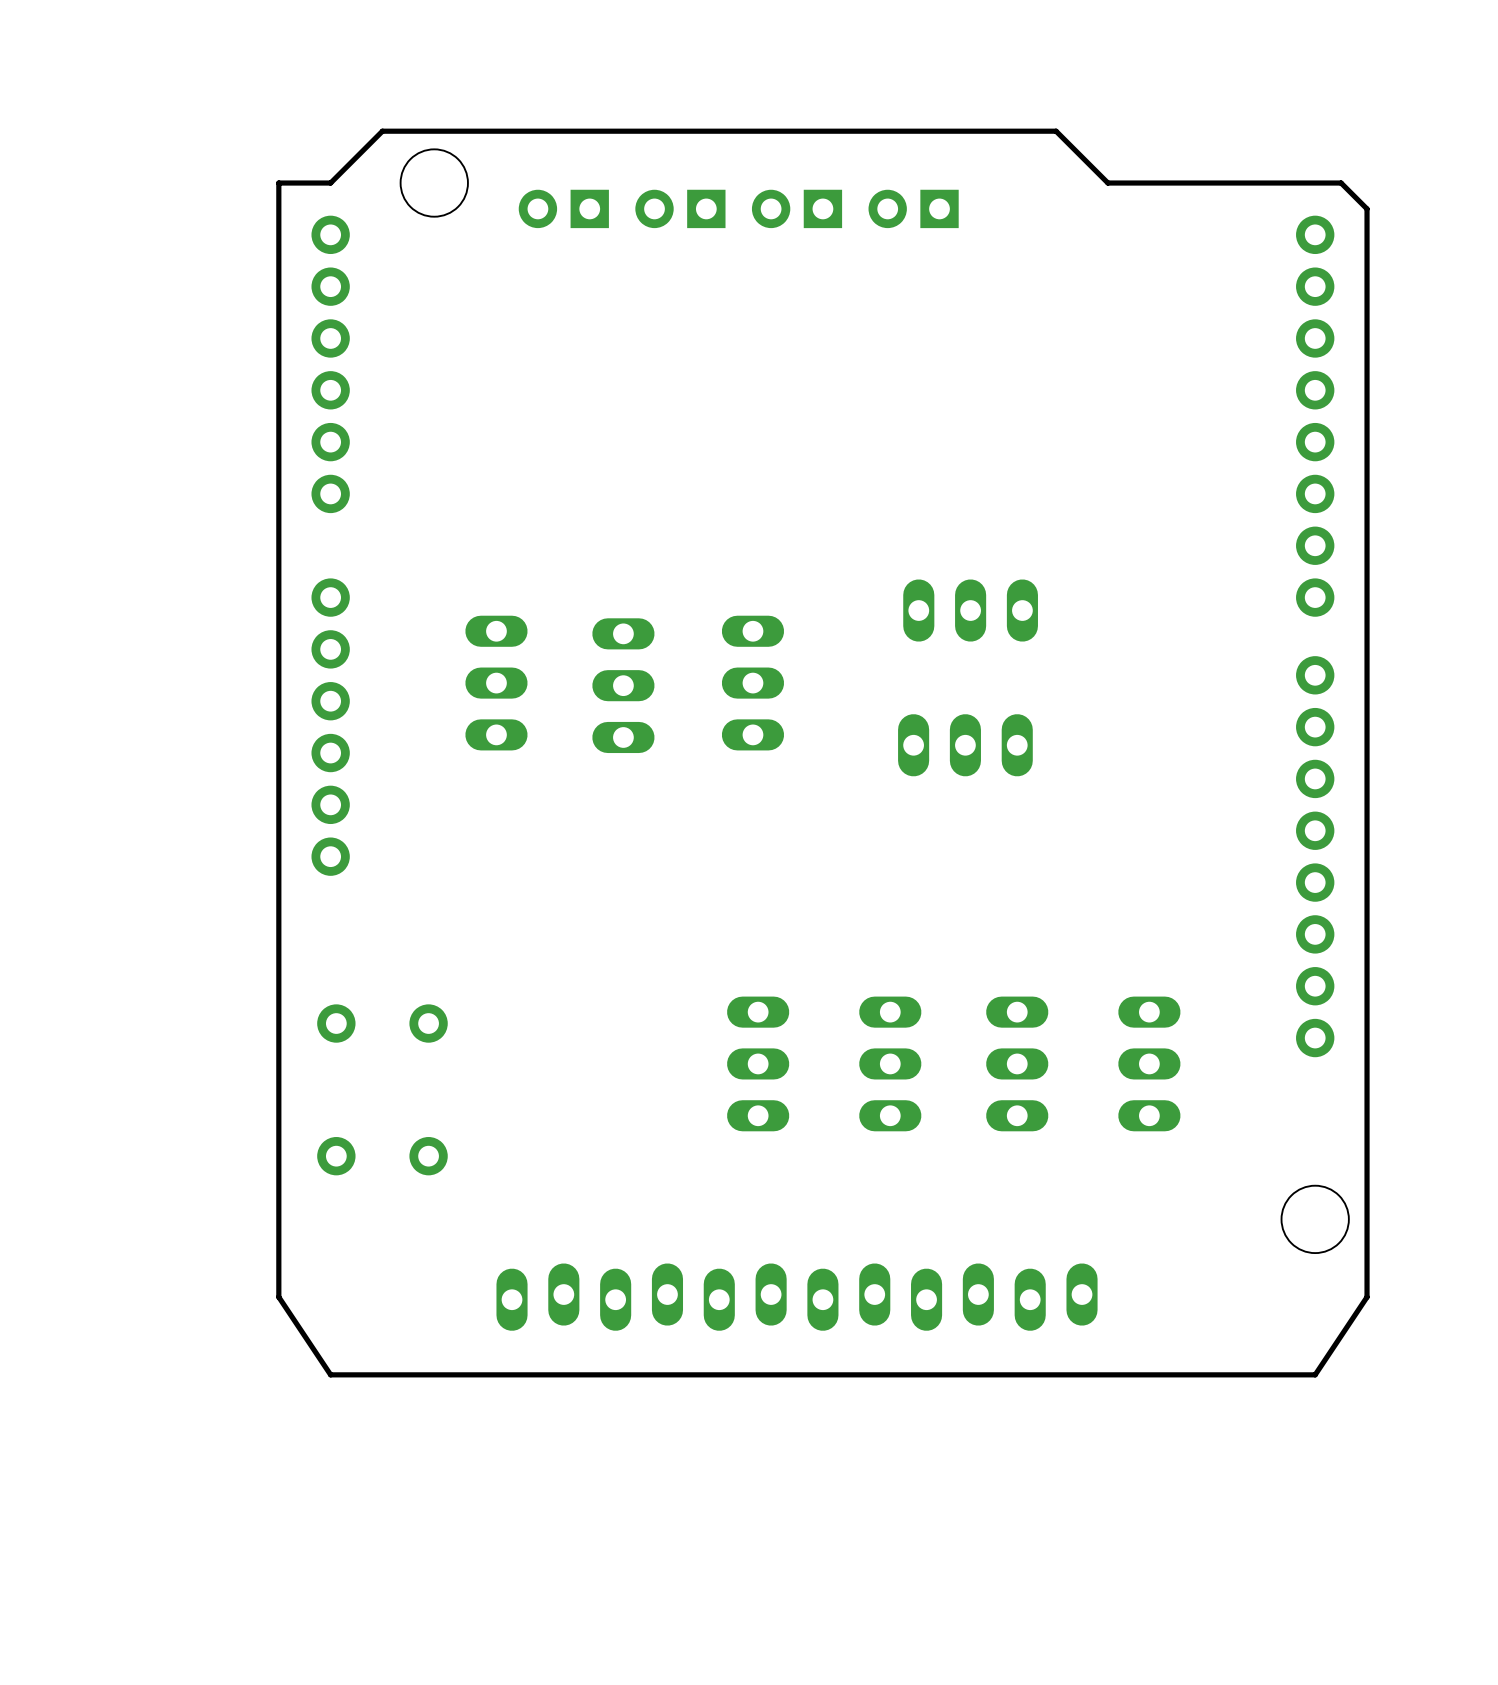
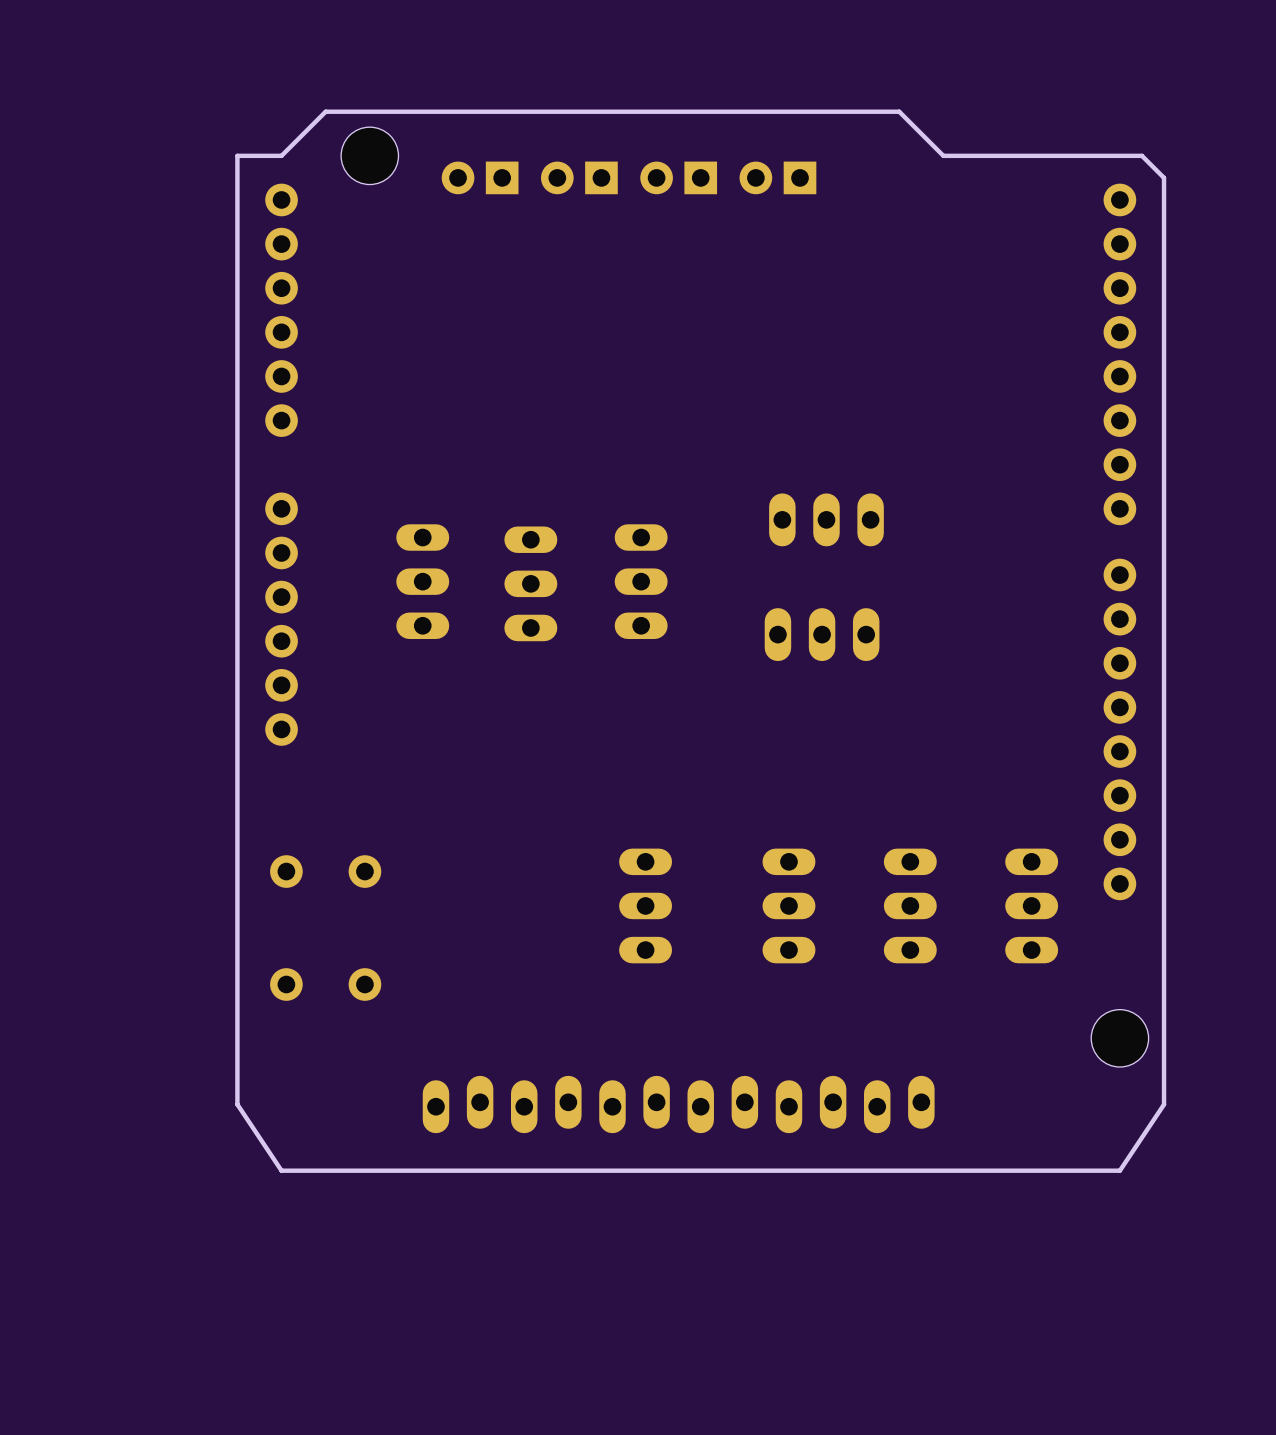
part position: (890, 1063) -> (788, 905)
part: (1017, 1063) -> none
part: none -> (910, 905)
part: (1149, 1063) -> none
part: none -> (1031, 905)

